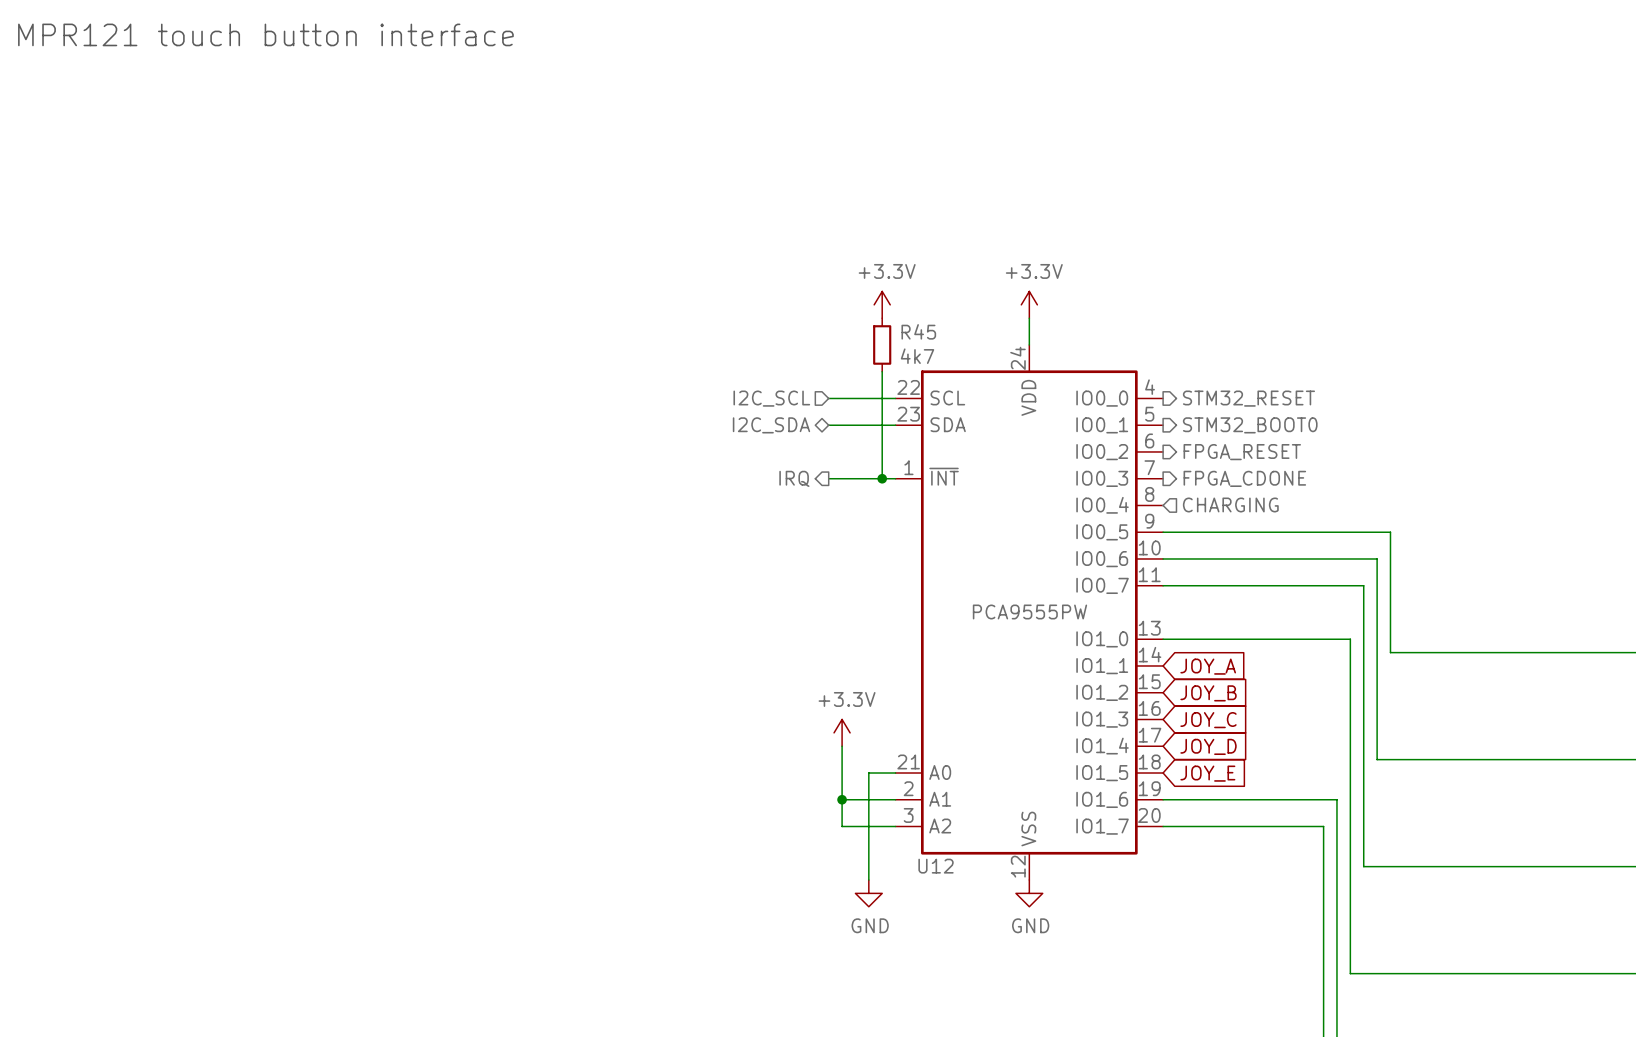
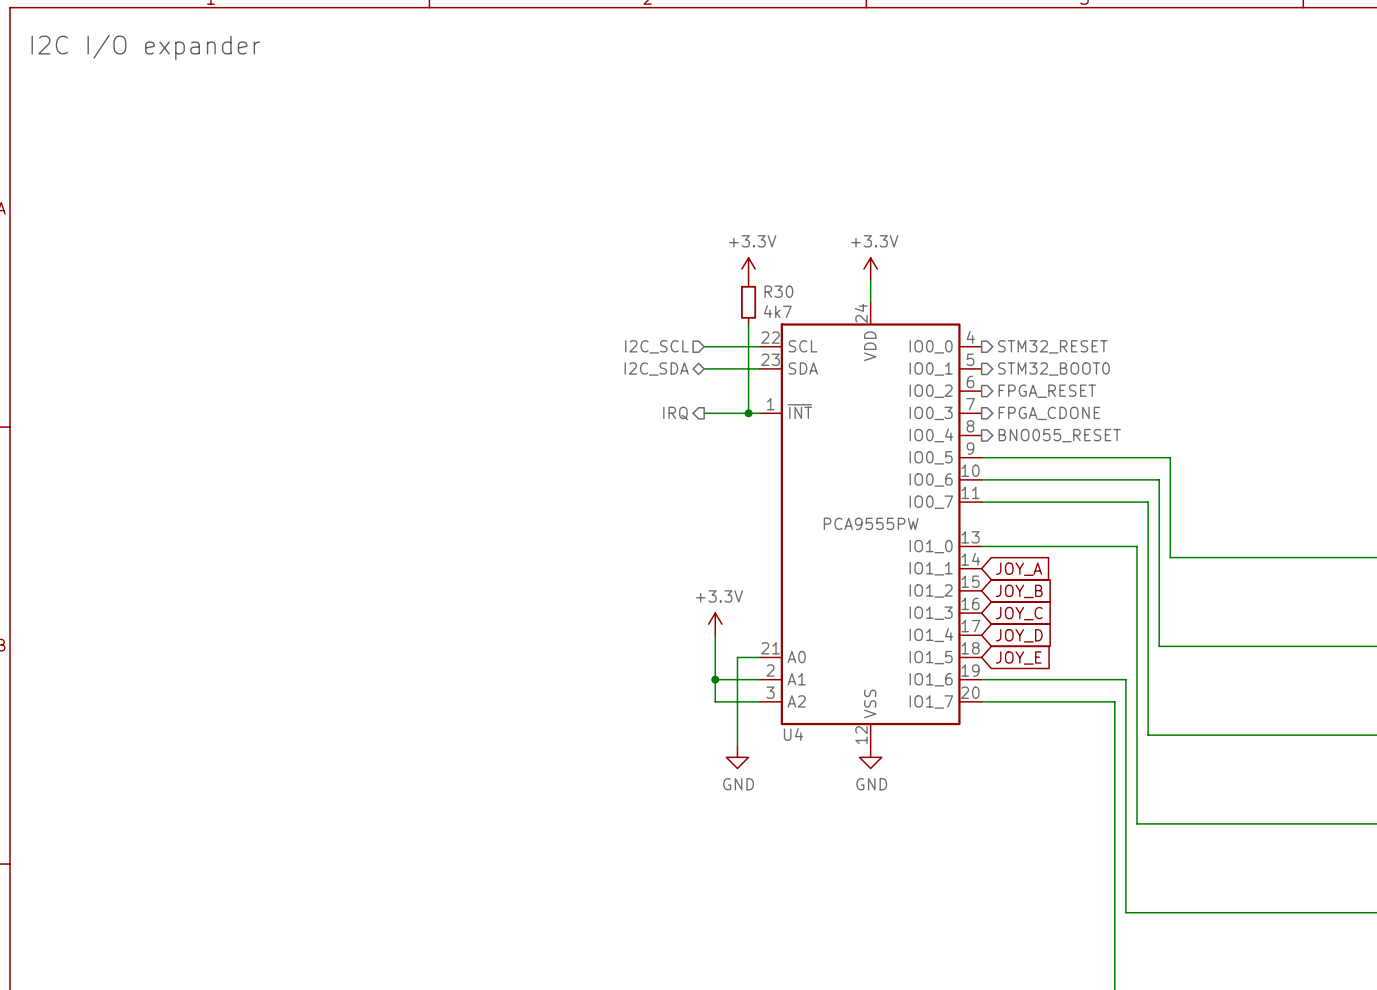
text: MPR121 touch button interface (265, 34) -> I2C I/O expander (145, 47)
R45 name: R45 (918, 331) -> R30 (778, 291)
hierarchical label shape: input (1230, 504) -> output (1059, 435)
hierarchical label: CHARGING (1230, 504) -> BNO055_RESET (1059, 435)
U12 name: U12 (936, 866) -> U4 (793, 734)

